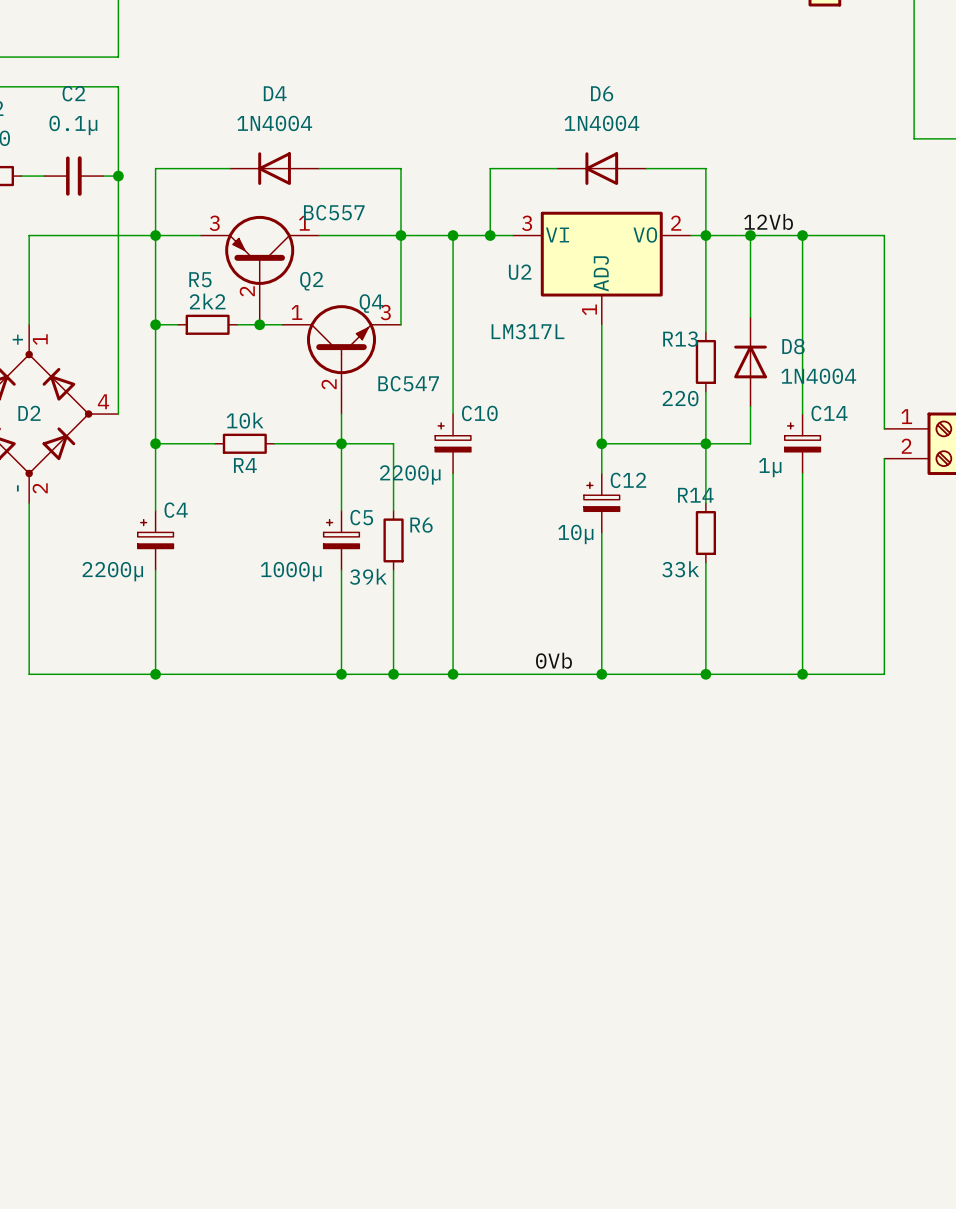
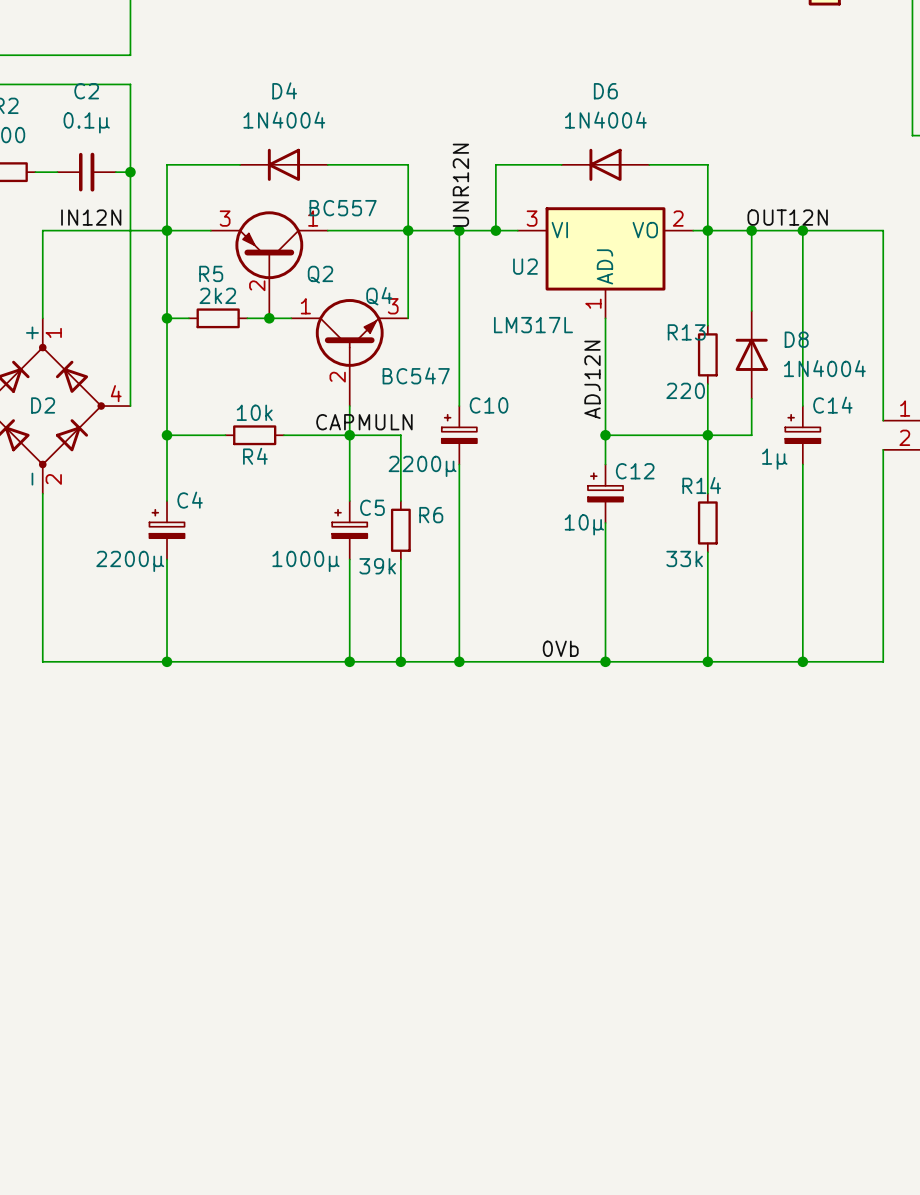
label: none -> UNR12N (460, 185)
label: 12Vb (768, 221) -> OUT12N (787, 217)
label: none -> IN12N (91, 217)
label: none -> ADJ12N (592, 379)
label: none -> CAPMULN (364, 422)

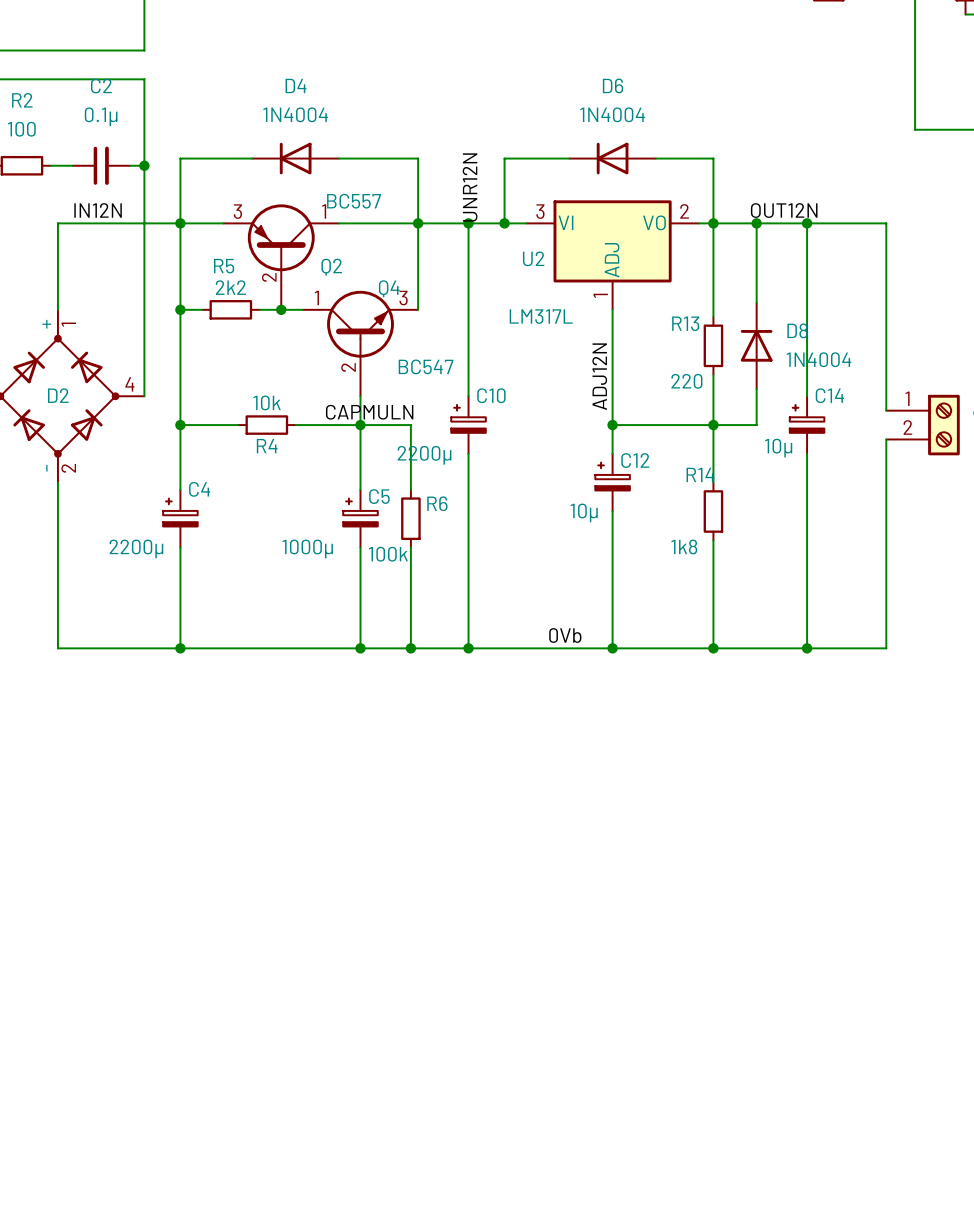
C14 value: 1µ (774, 459) -> 10µ (778, 448)
R14 value: 33k (684, 558) -> 1k8 (684, 546)
R6 value: 39k (377, 566) -> 100k (388, 554)

